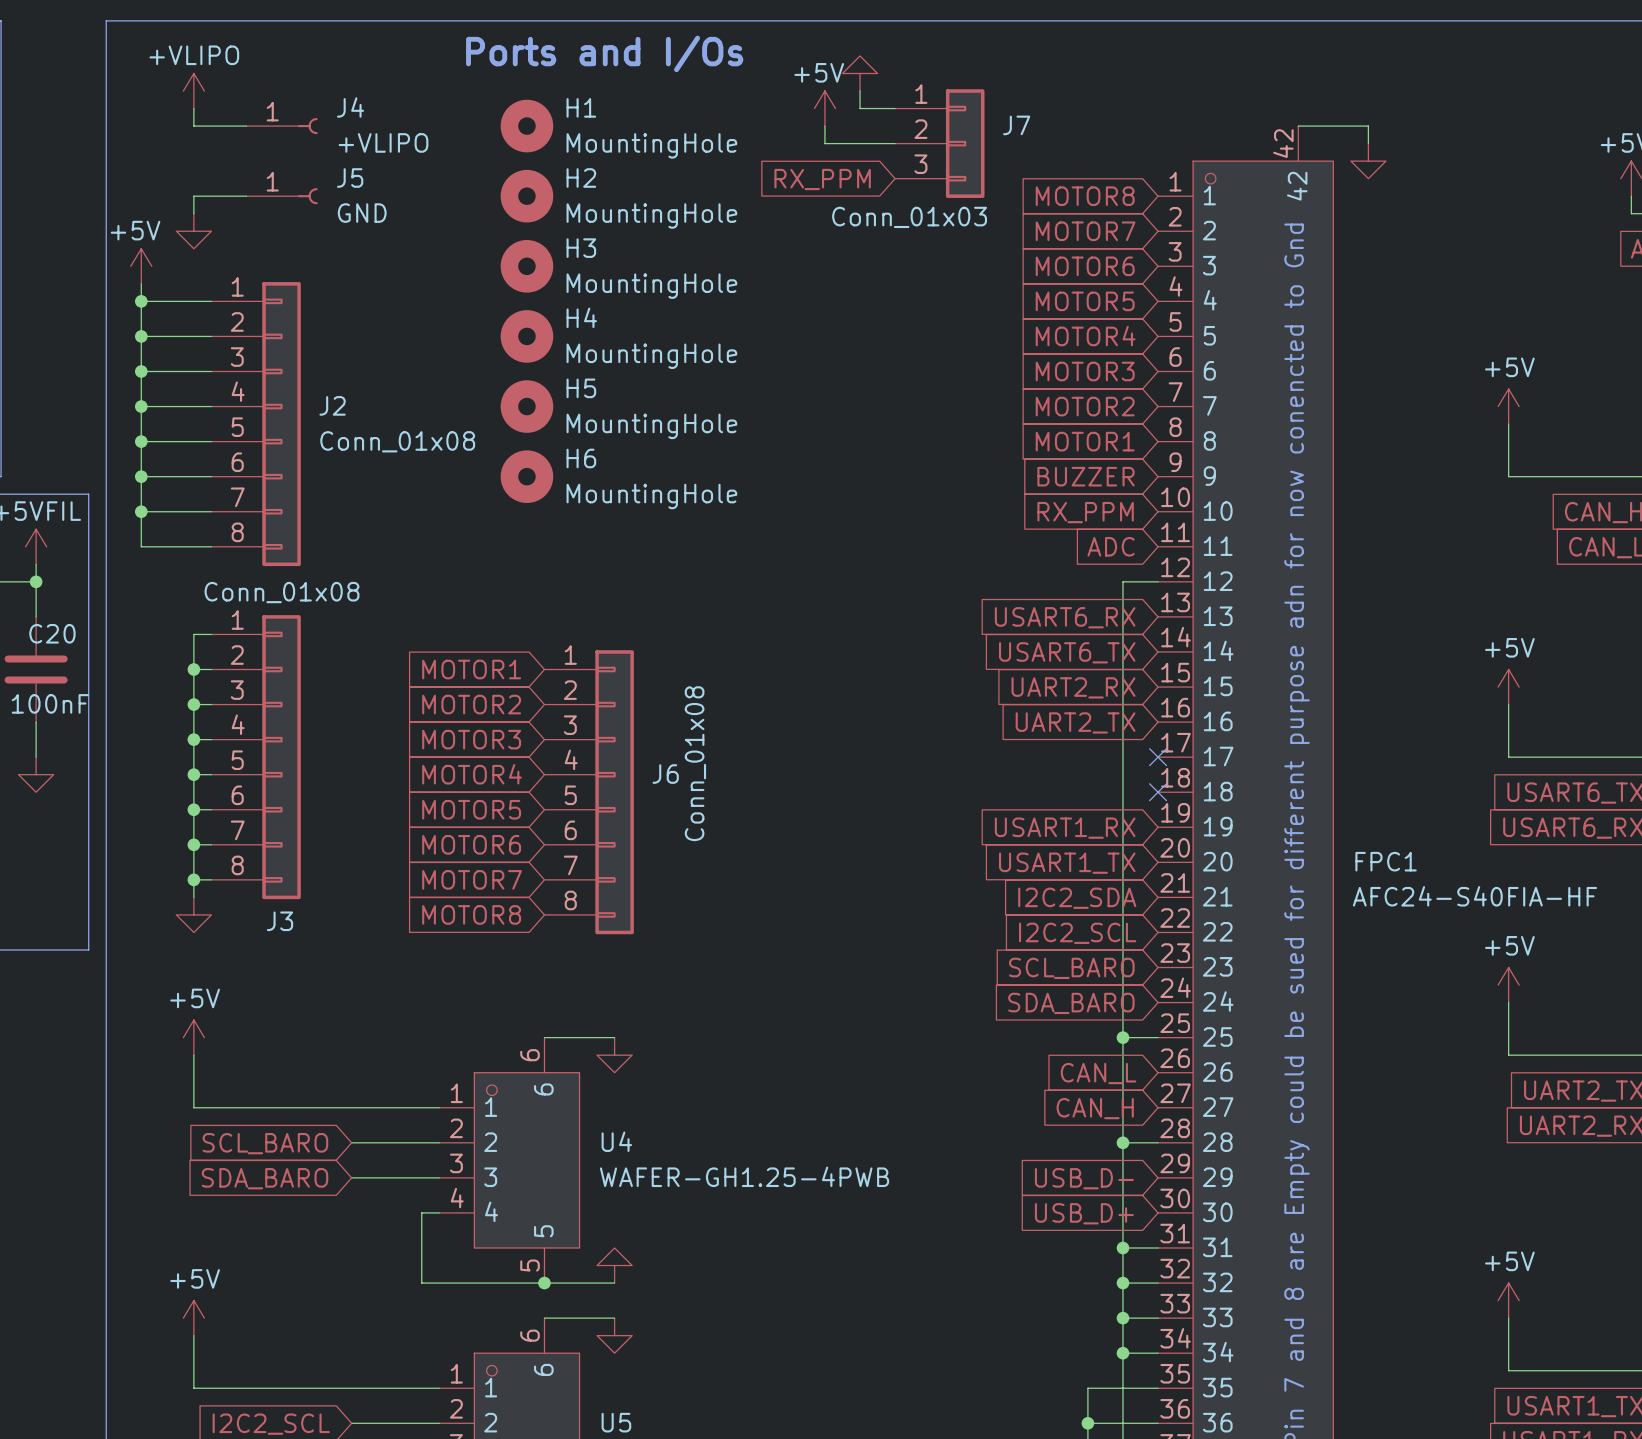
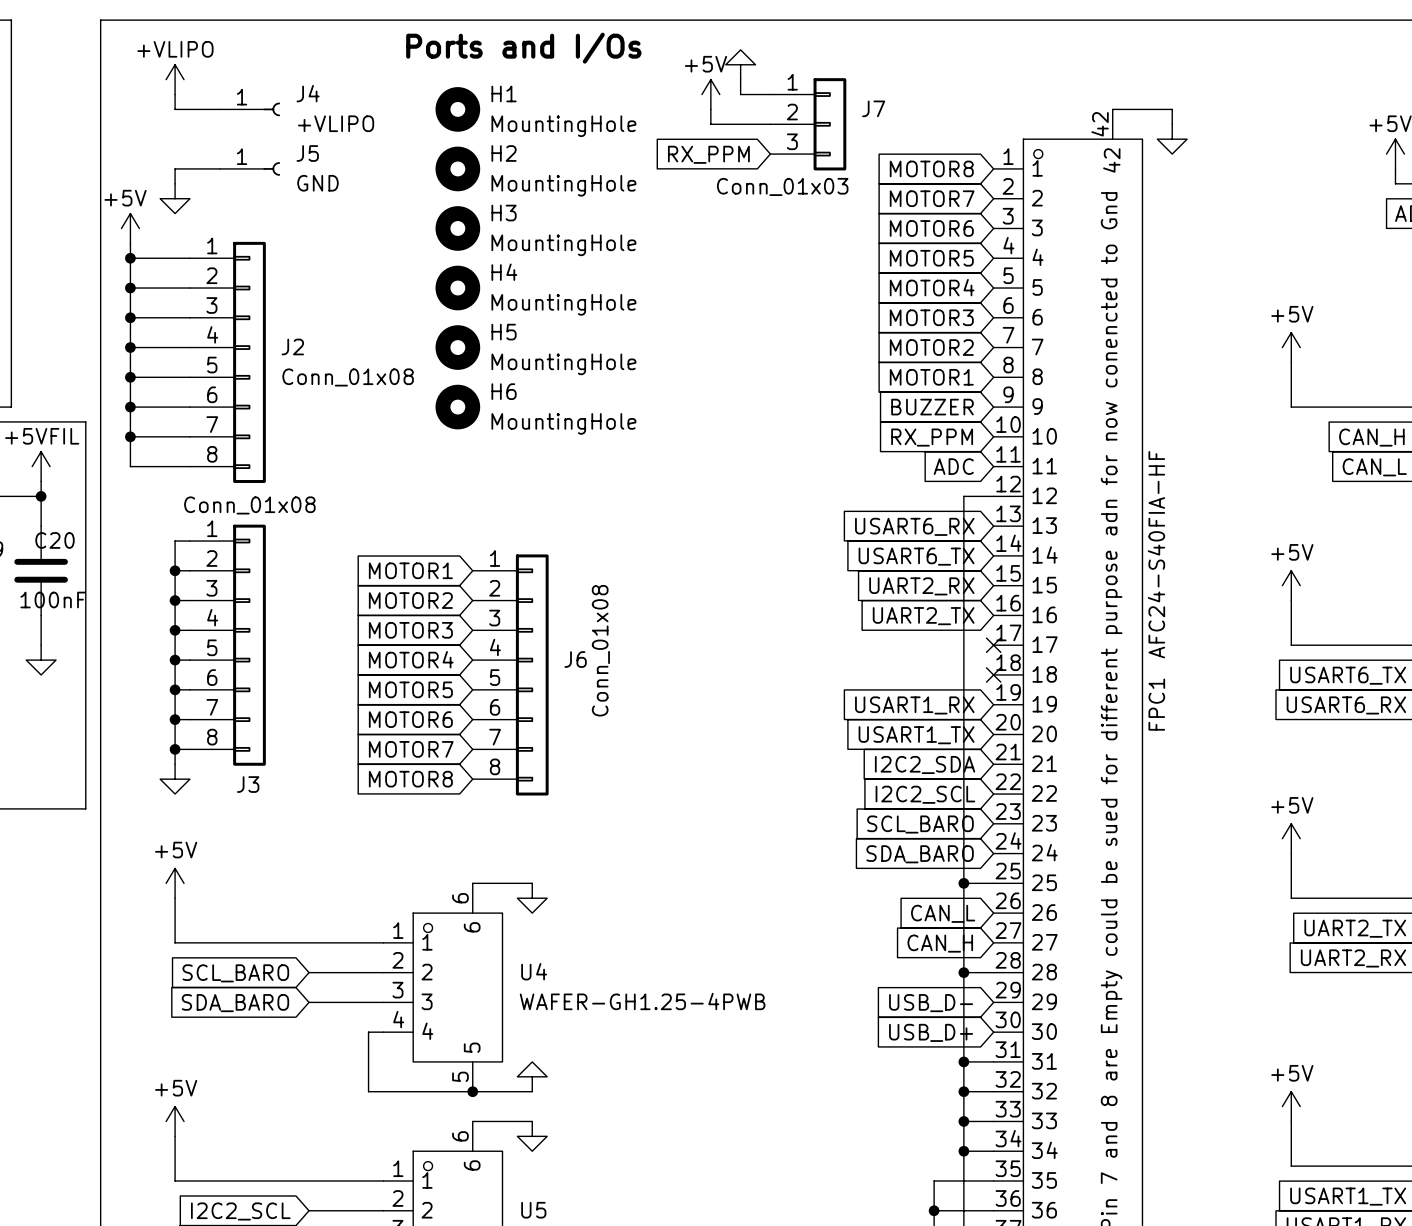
FPC1 name rotation: 0° (1386, 861) -> 90° counterclockwise (1156, 704)
FPC1 value rotation: 0° (1474, 896) -> 90° counterclockwise (1156, 554)
FPC1 value position: AFC24-S40FIA-HF (1474, 896) -> AFC24-S40FIA-HF (1156, 554)

